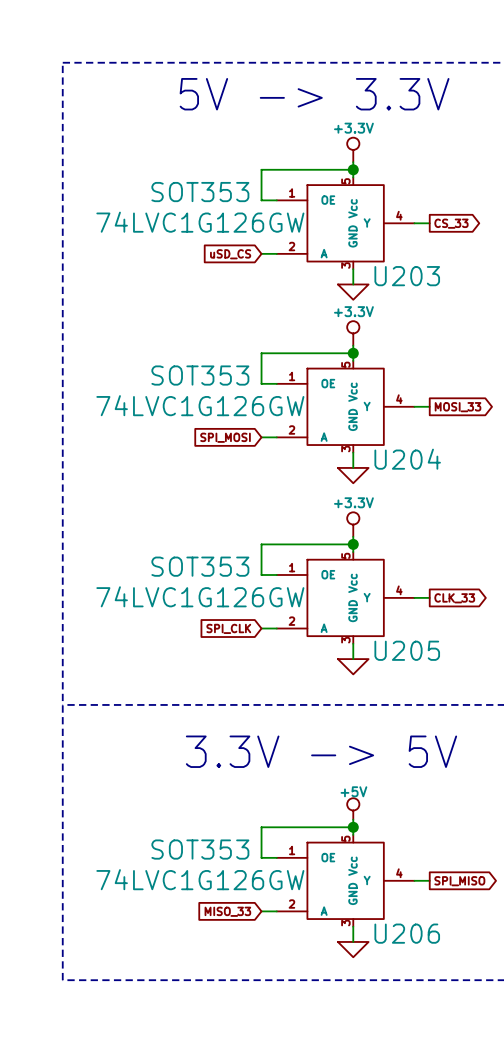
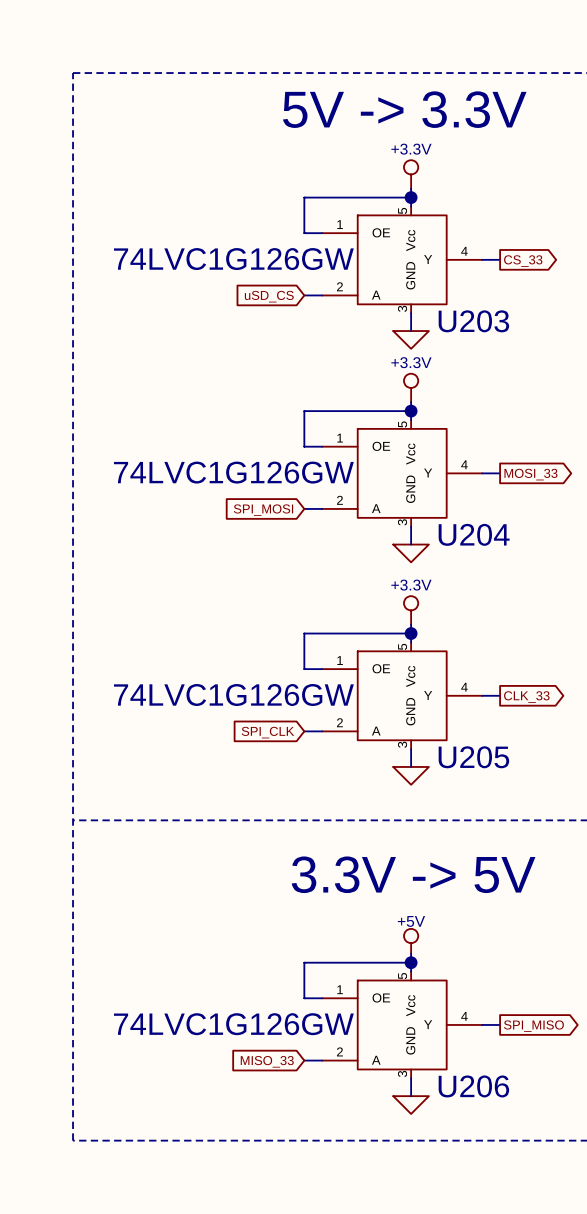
U203 text: SOT353 (200, 192) -> none
U204 text: SOT353 (200, 375) -> none
U205 text: SOT353 (200, 566) -> none
U206 text: SOT353 (200, 849) -> none

